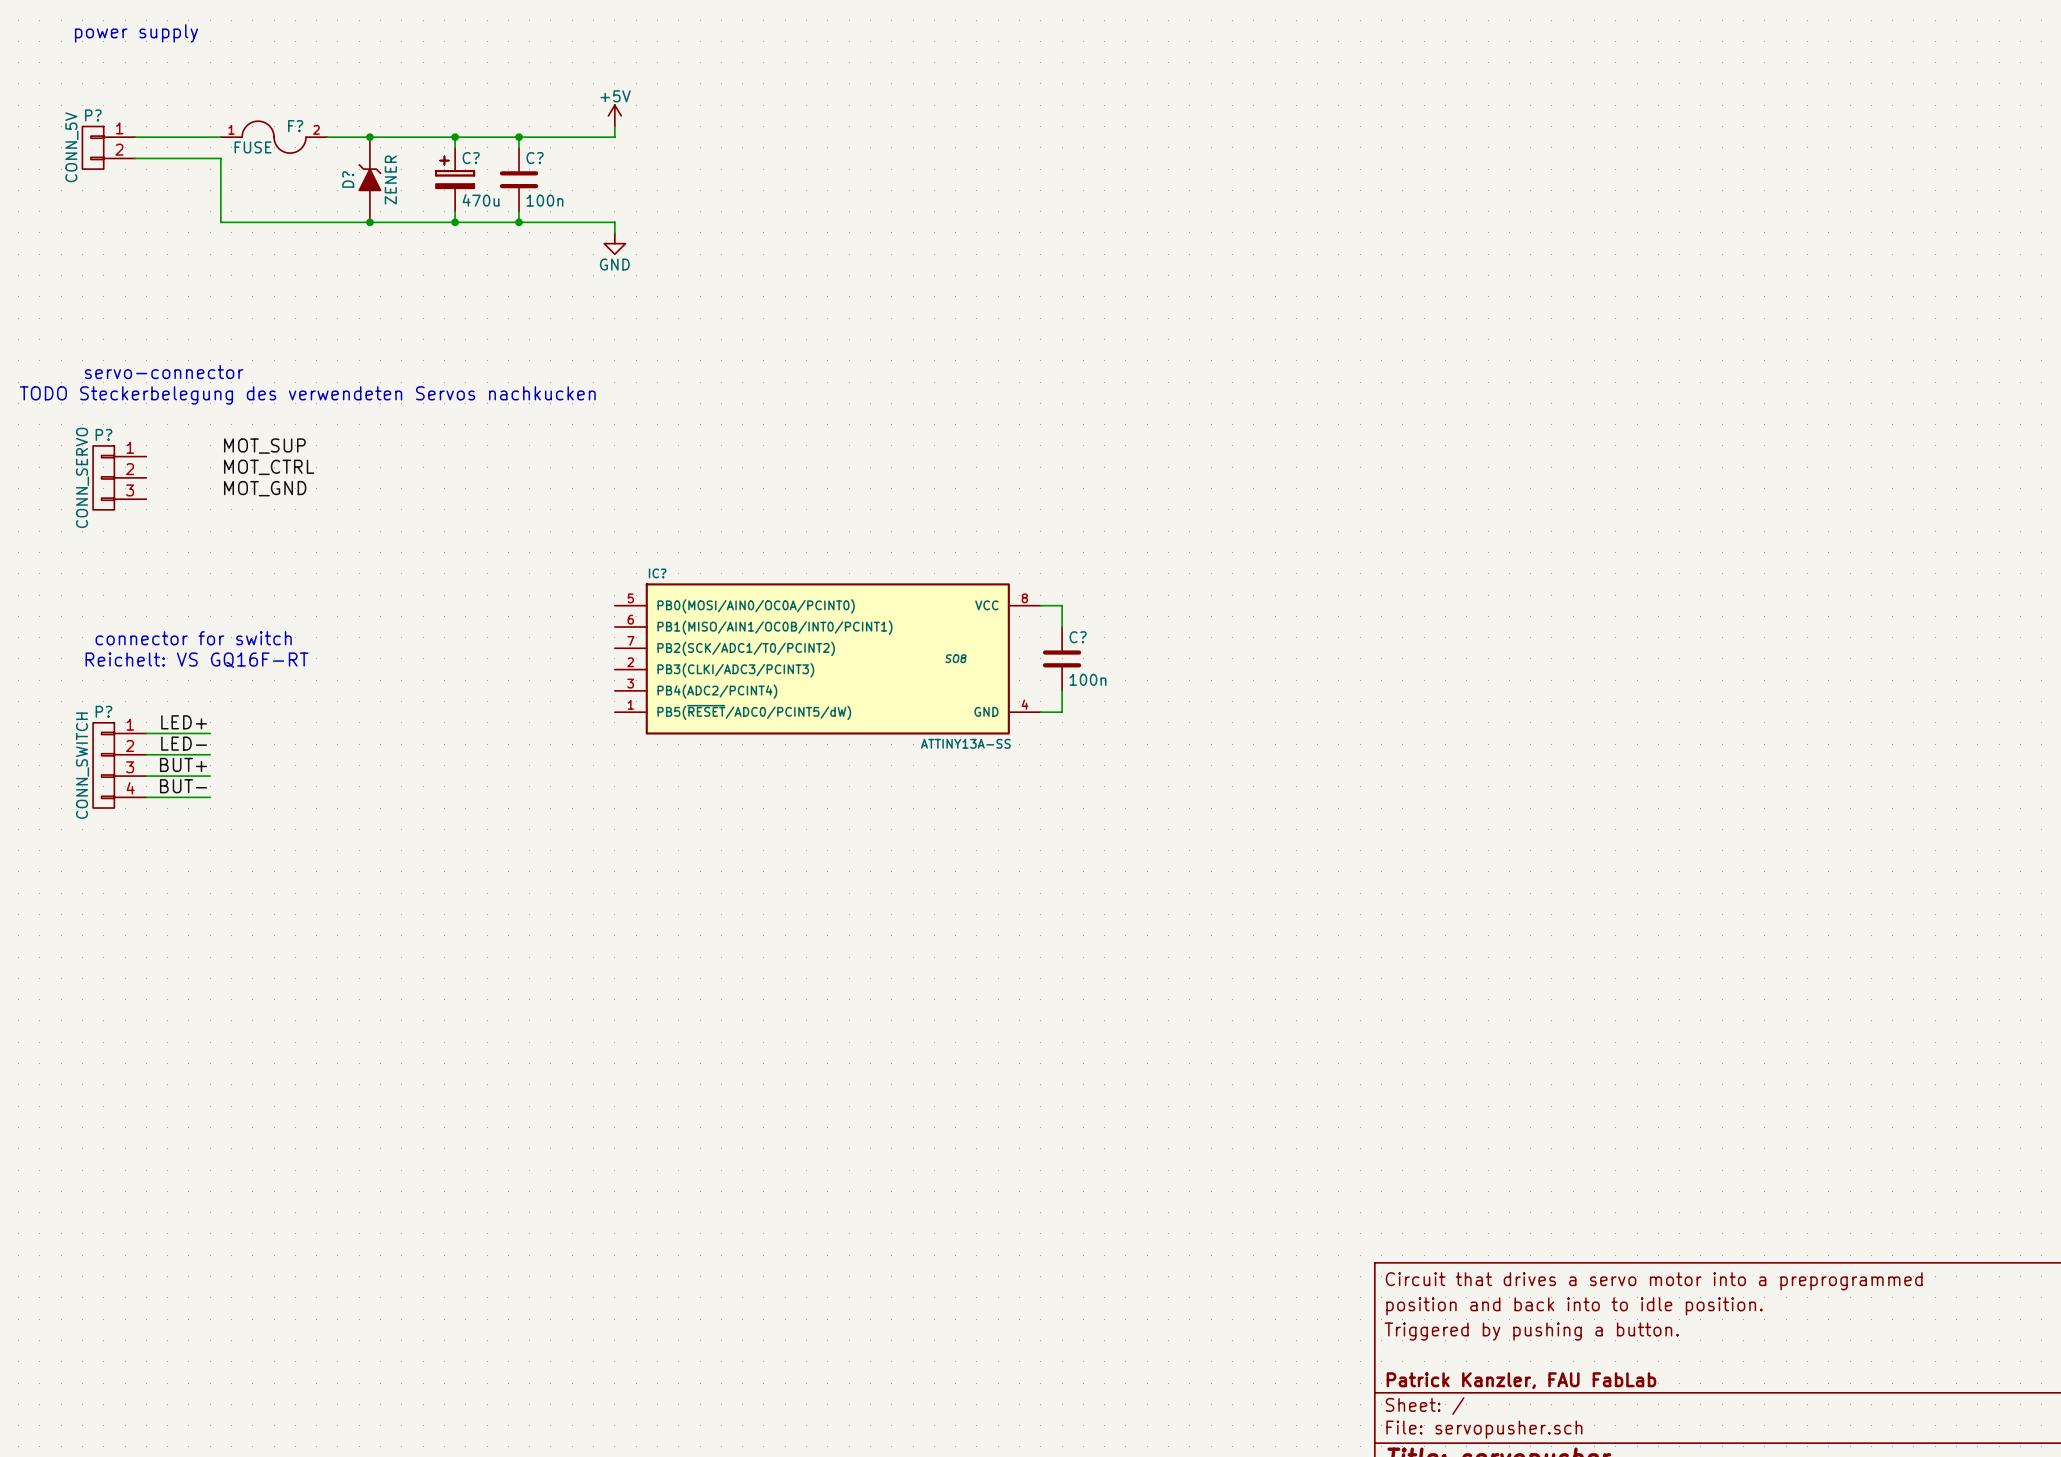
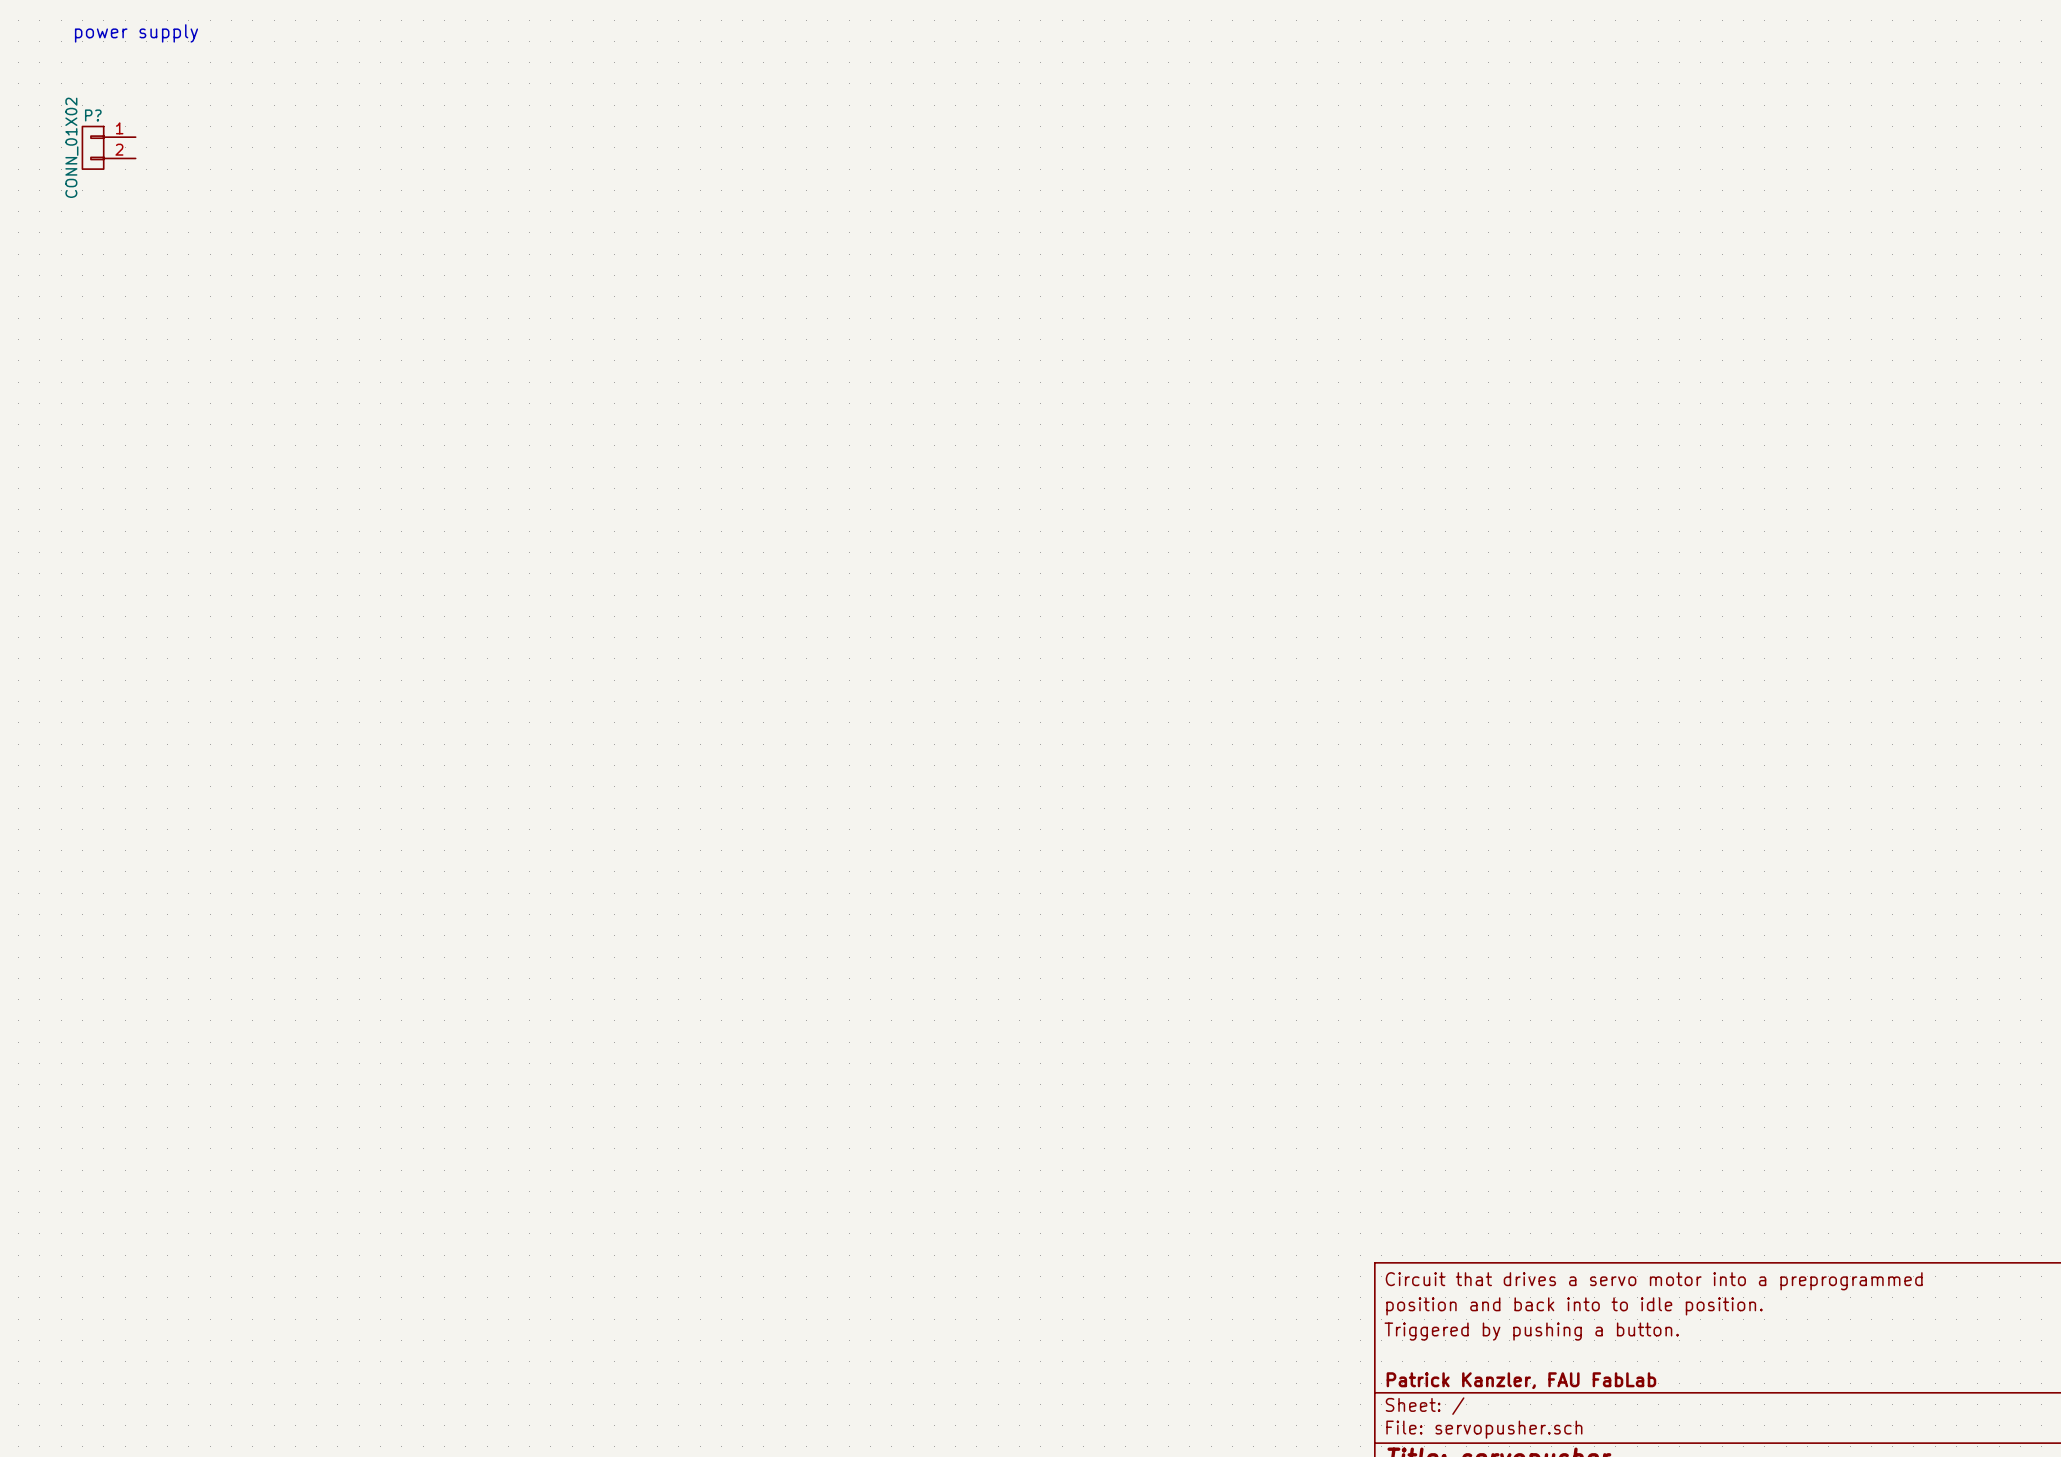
power symbol: +5V (614, 115) -> none
wire: (614, 126) (614, 137) (327, 137) -> none
wire: (135, 137) (220, 137) -> none
F?: FUSE (274, 137) -> none
junction: (369, 137) -> none
wire: (455, 137) (455, 147) -> none
junction: (455, 137) -> none
wire: (519, 137) (519, 147) -> none
junction: (519, 137) -> none
P? value: CONN_5V (71, 147) -> CONN_01X02 (71, 147)
wire: (135, 158) (220, 158) (220, 222) (614, 222) (614, 232) -> none
D?: ZENER (369, 179) -> none
C?: 470u (455, 179) -> none
C?: 100n (519, 179) -> none
wire: (455, 211) (455, 222) -> none
wire: (519, 211) (519, 222) -> none
junction: (369, 222) -> none
junction: (455, 222) -> none
junction: (519, 222) -> none
power symbol: GND (614, 243) -> none
text: servo-connector (164, 372) -> none
text: TODO Steckerbelegung des verwendeten Servos nachkucken (307, 395) -> none
label: MOT_SUP (264, 446) -> none
label: MOT_CTRL (269, 467) -> none
P?: CONN_SERVO (119, 477) -> none
label: MOT_GND (265, 488) -> none
wire: (1040, 605) (1062, 605) (1062, 626) -> none
text: connector for switch (193, 638) -> none
IC?: ATTINY13A-SS (827, 658) -> none
C?: 100n (1062, 658) -> none
text: Reichelt: VS GQ16F-RT (197, 660) -> none
wire: (1062, 690) (1062, 712) (1040, 712) -> none
label: LED+ (184, 722) -> none
wire: (146, 733) (210, 733) -> none
label: LED- (184, 743) -> none
wire: (146, 754) (210, 754) -> none
label: BUT+ (183, 764) -> none
P?: CONN_SWITCH (119, 765) -> none
wire: (146, 776) (210, 776) -> none
label: BUT- (183, 786) -> none
wire: (146, 797) (210, 797) -> none

